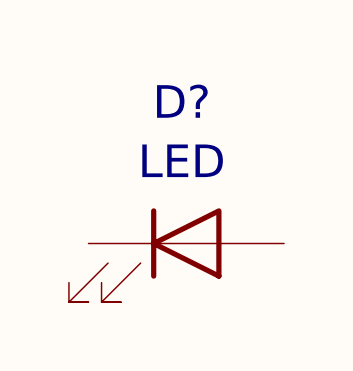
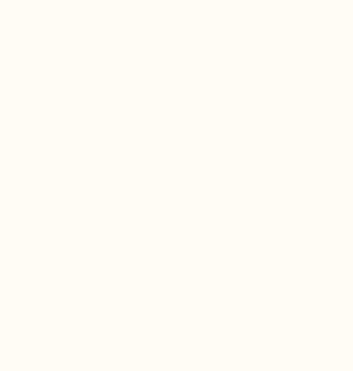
D?: LED (176, 255) -> none

